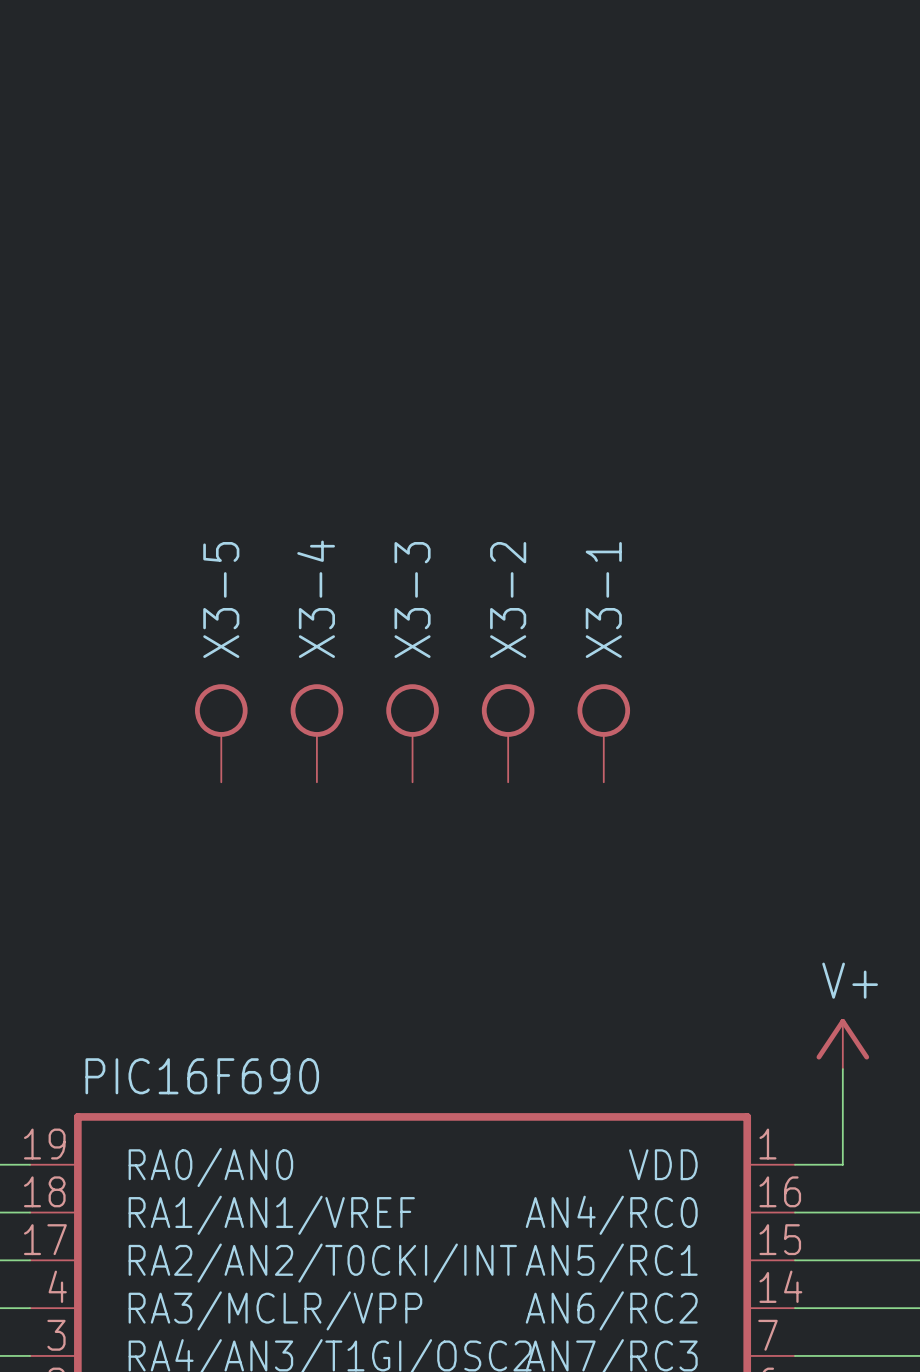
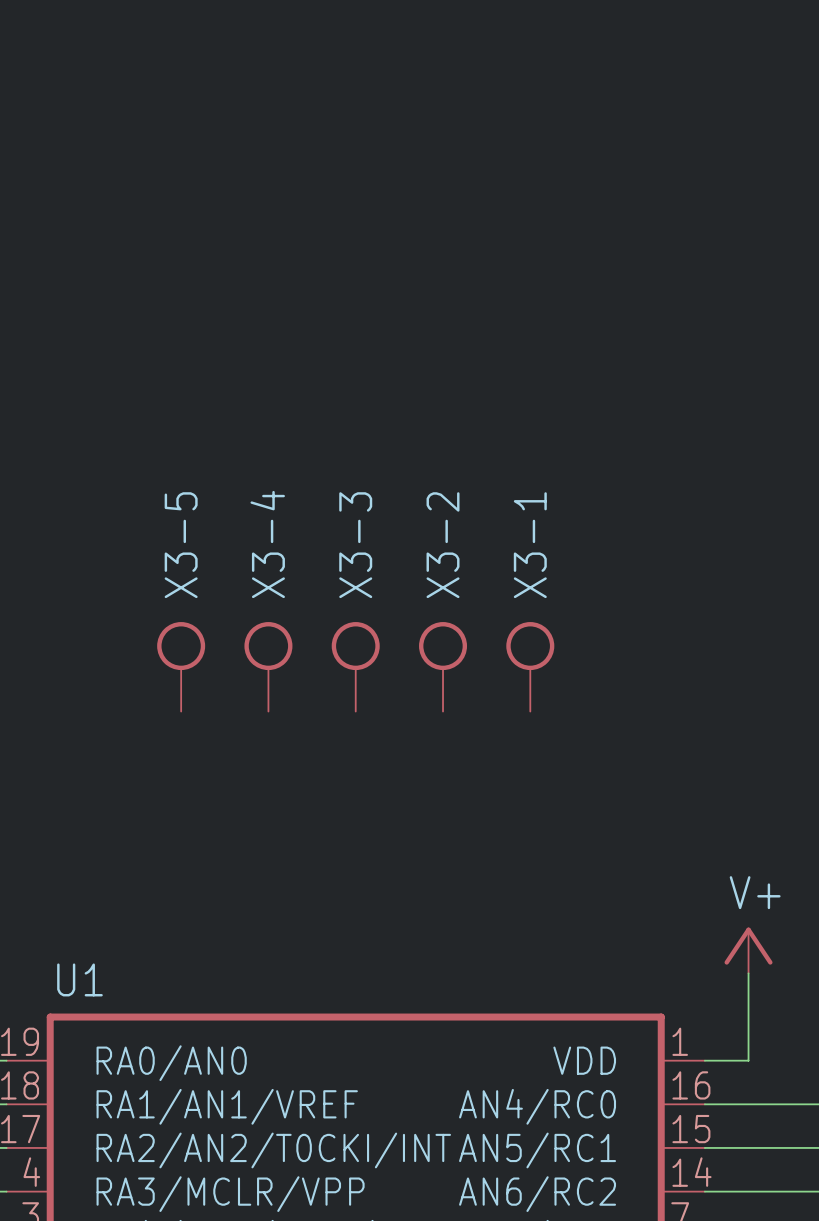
PIC16F690 name: PIC16F690 (202, 1076) -> U1 (79, 979)

